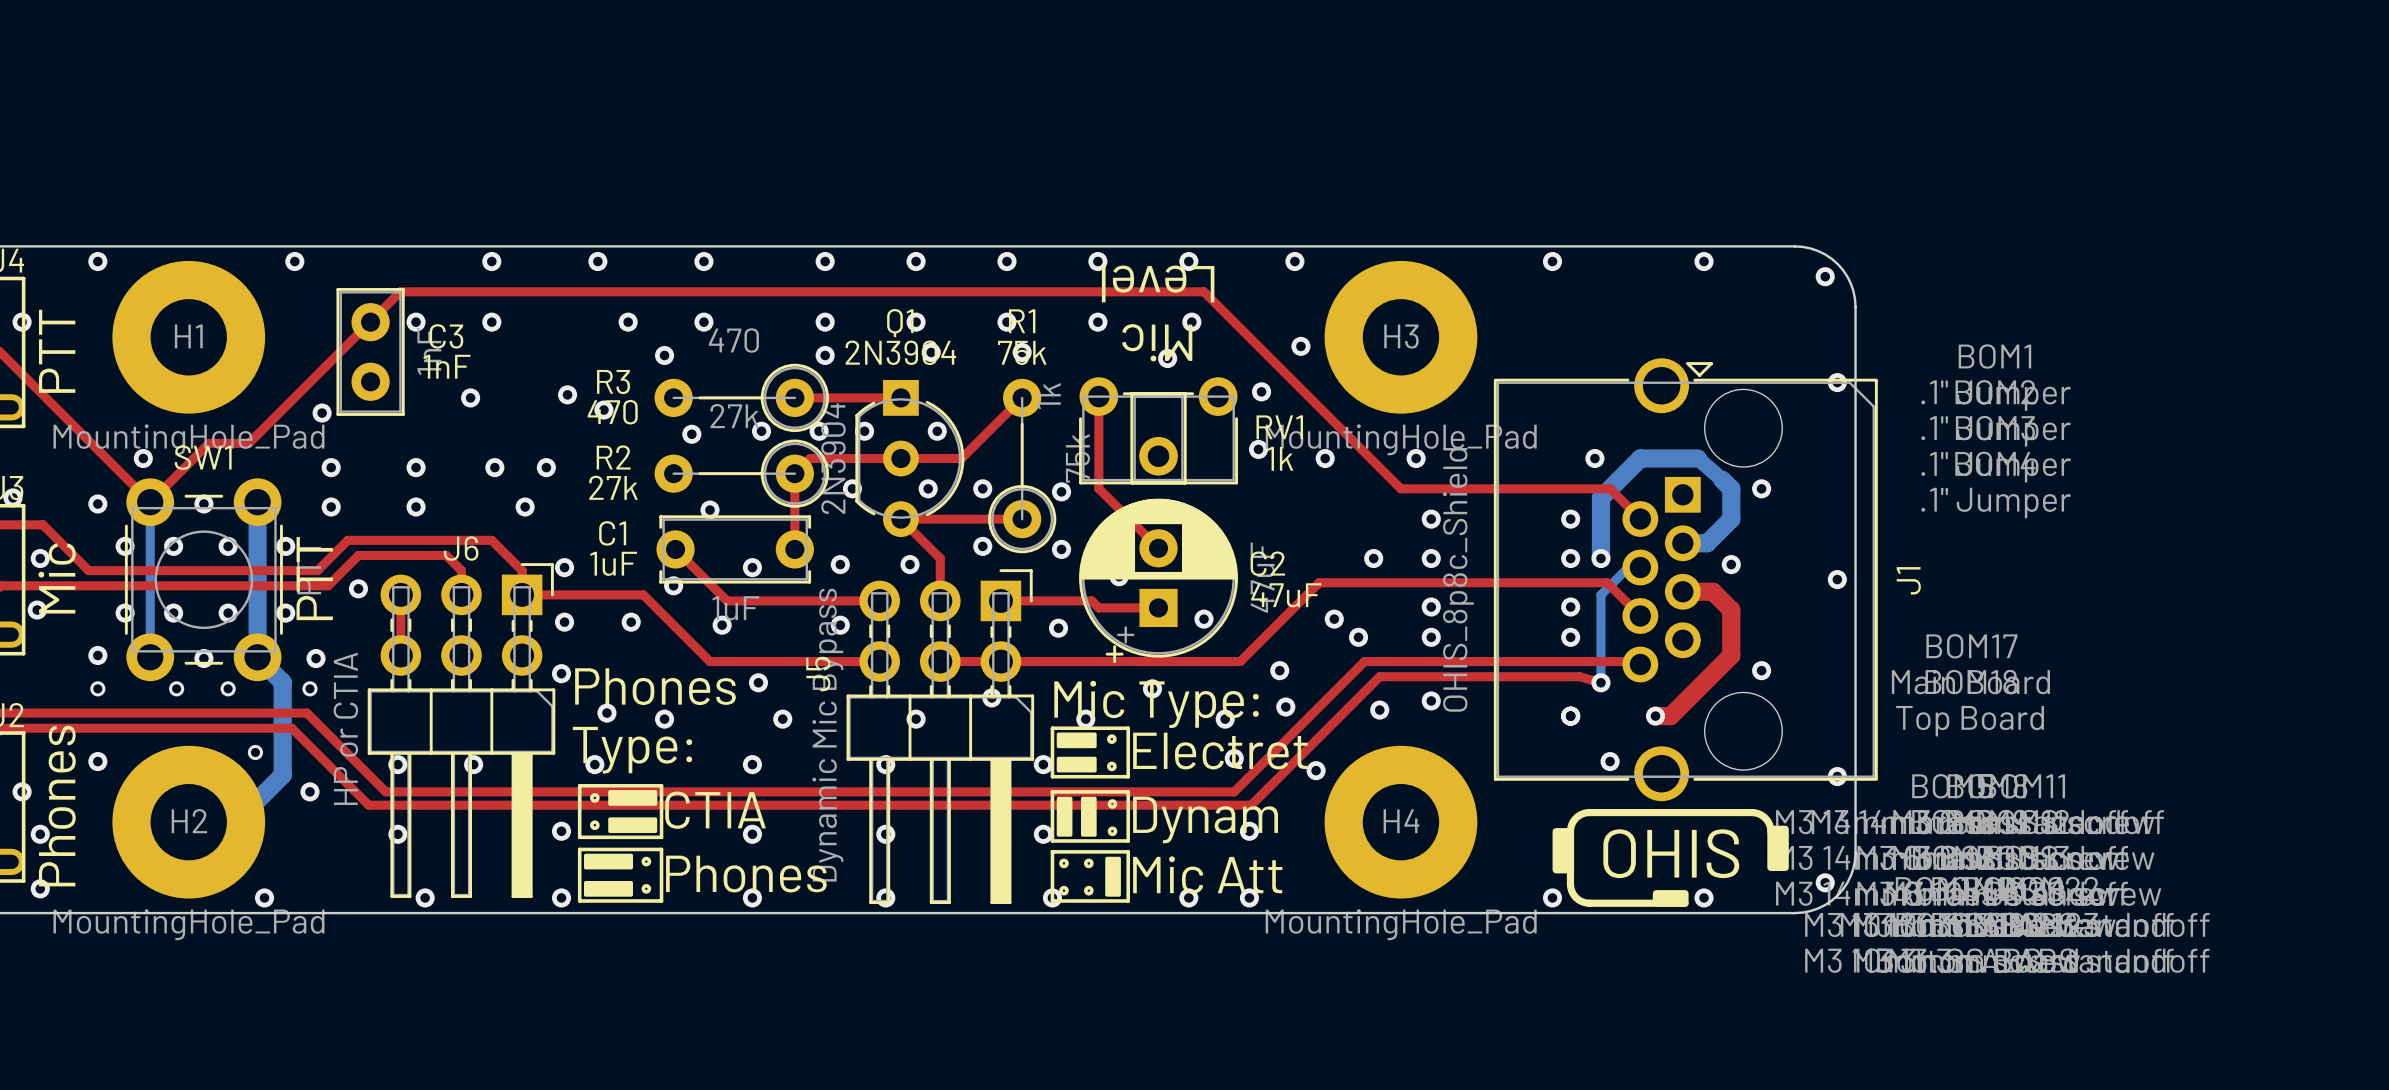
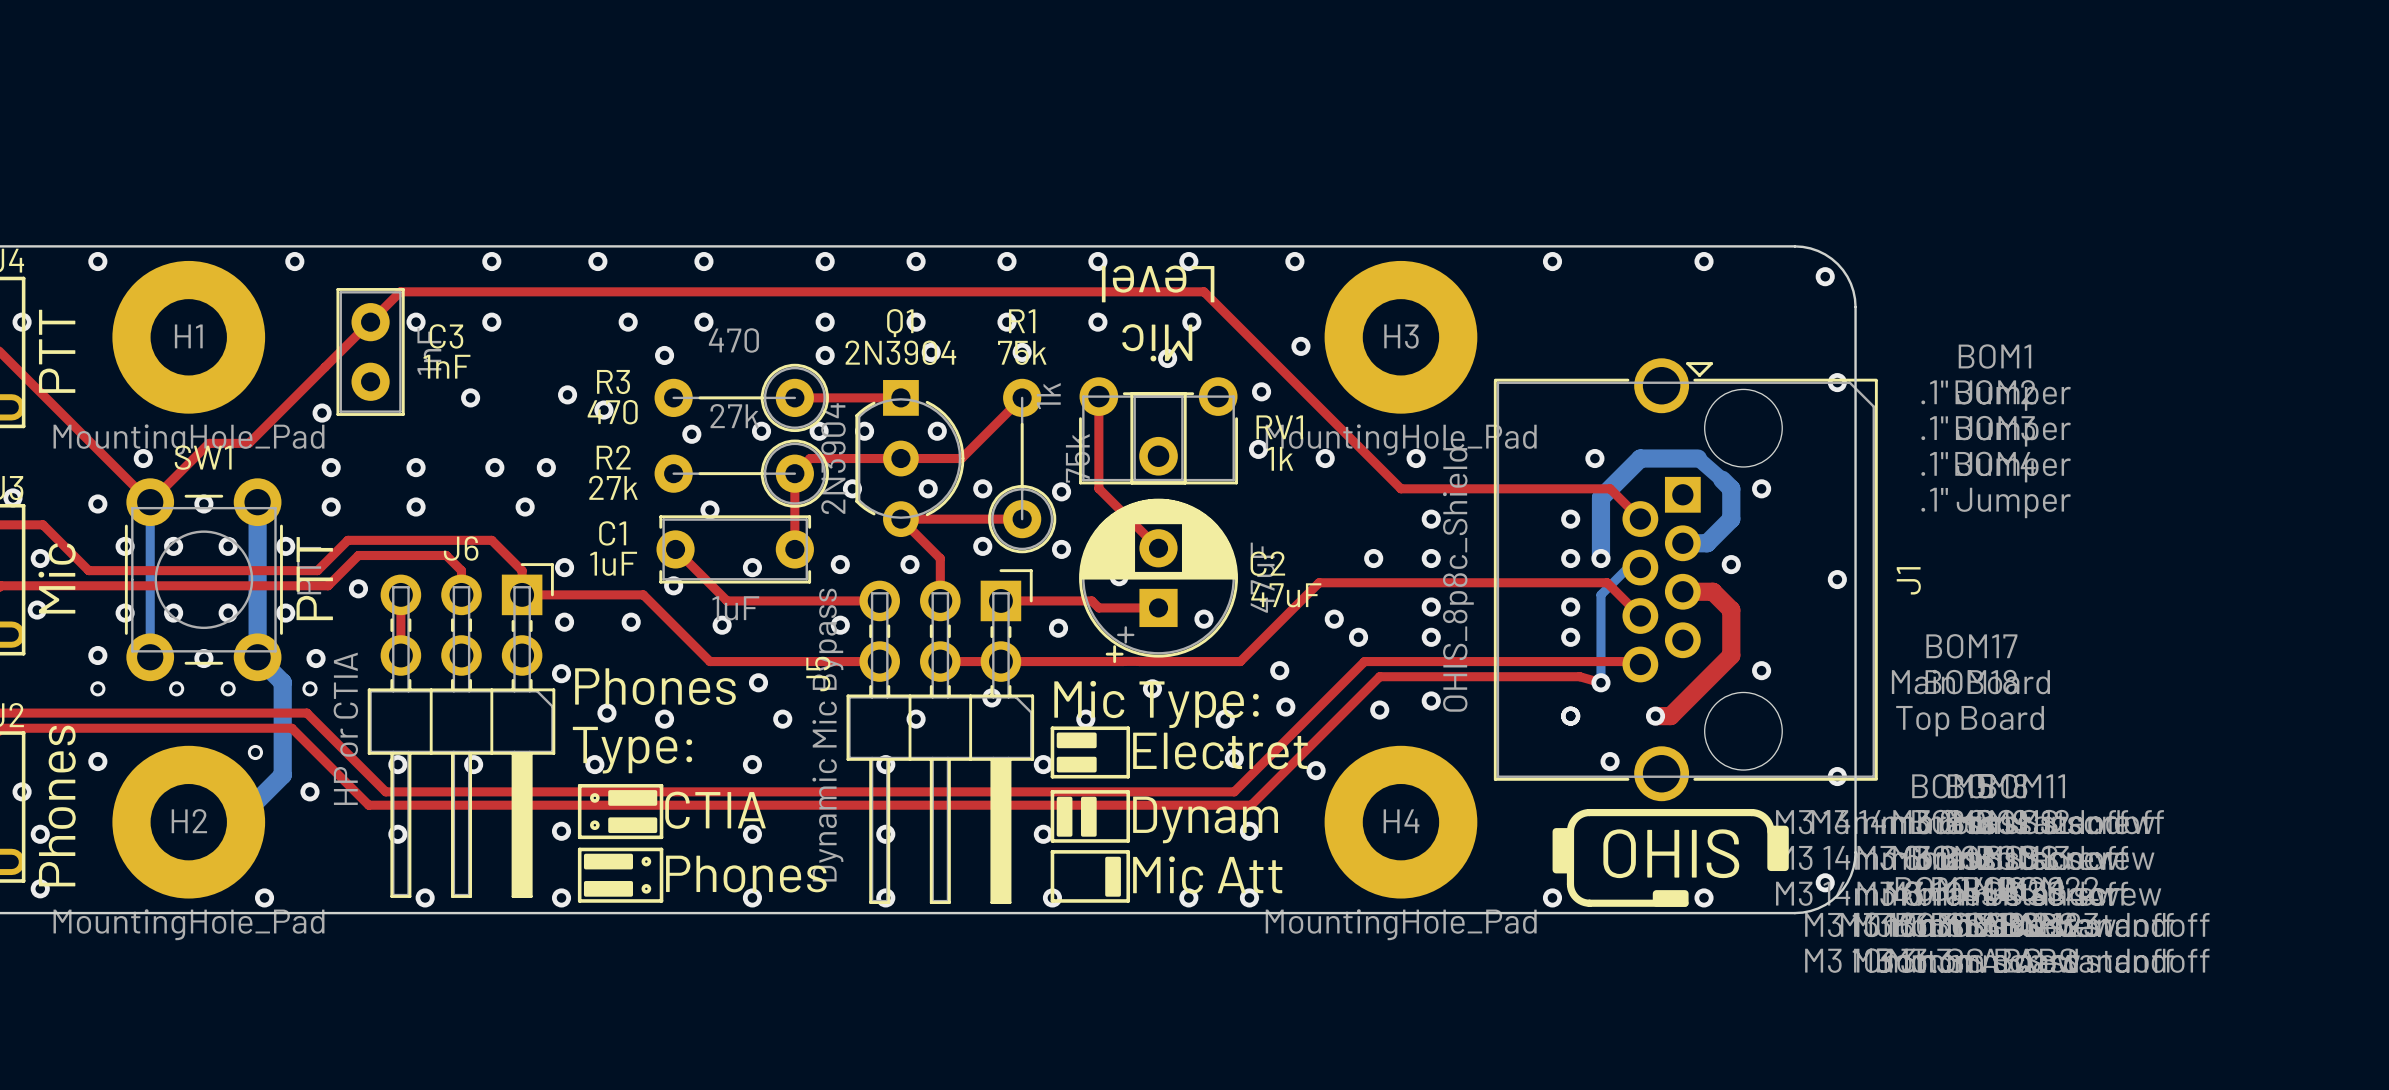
drawing: [1059, 734, 1118, 896] -> none

